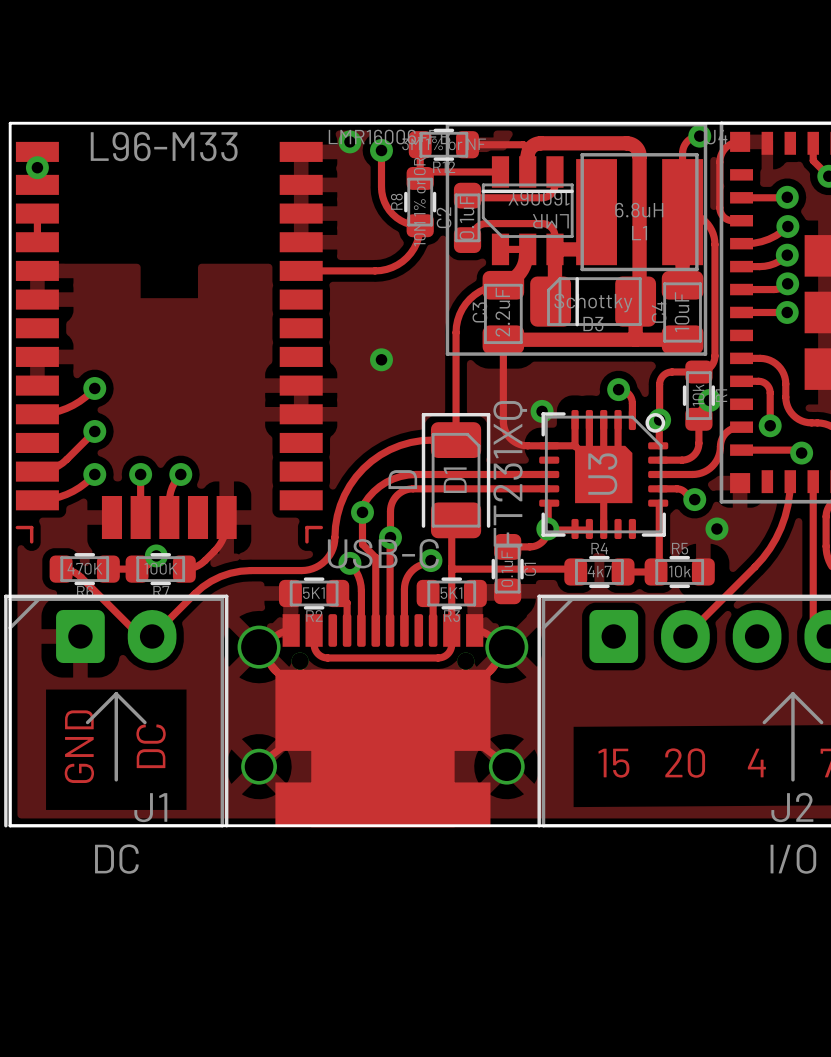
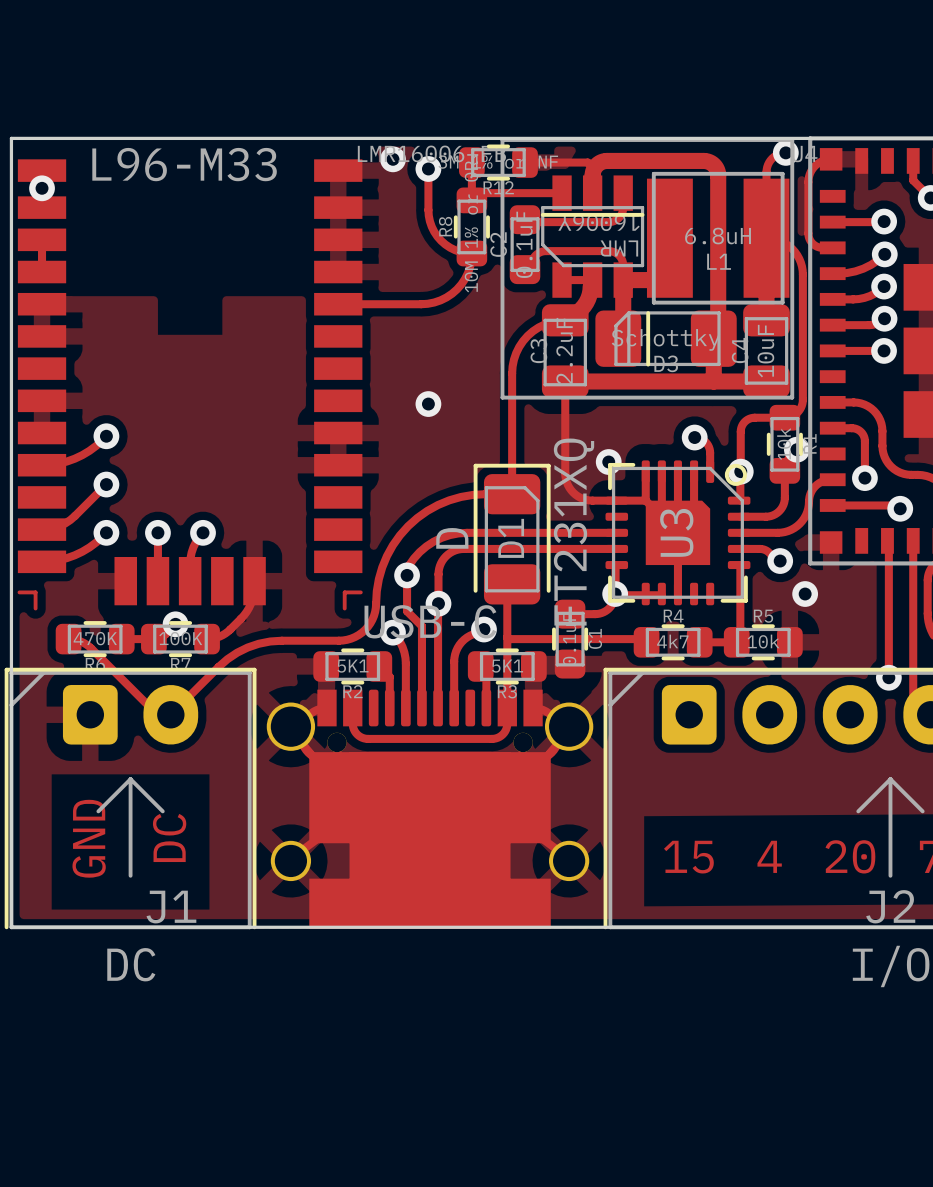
track: (790, 481) (785, 516) (769, 548) (754, 566) (685, 636) -> (887, 540) (888, 677)
via: none -> (888, 677)
text: 20 (685, 763) -> 4 (769, 856)
text: 4 (756, 763) -> 20 (850, 856)

